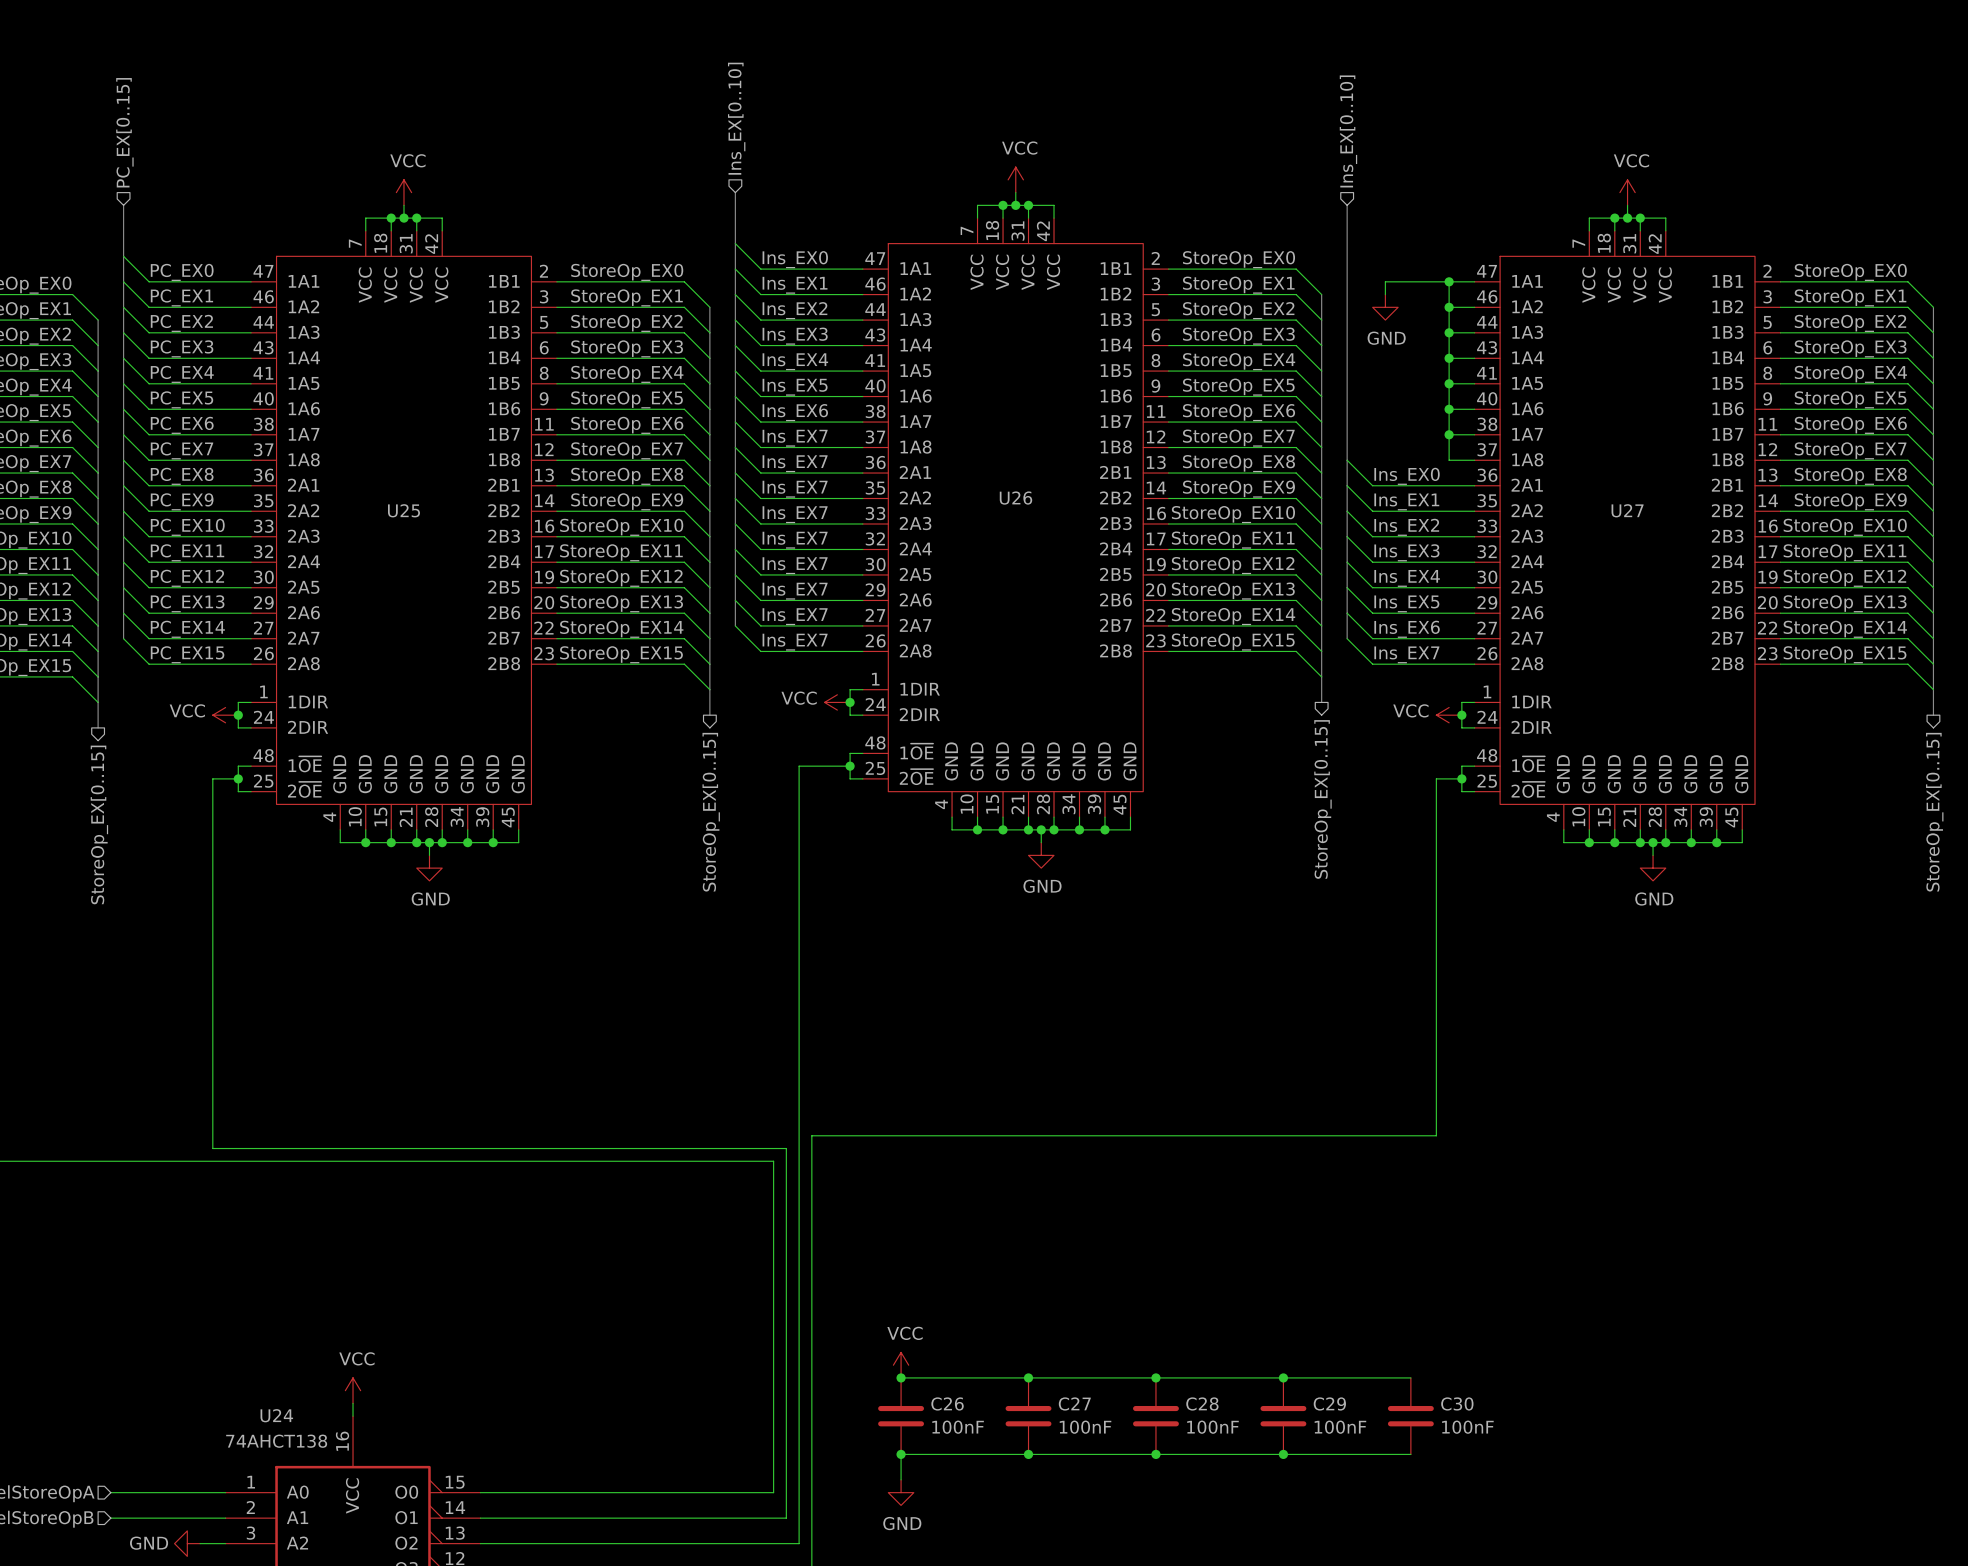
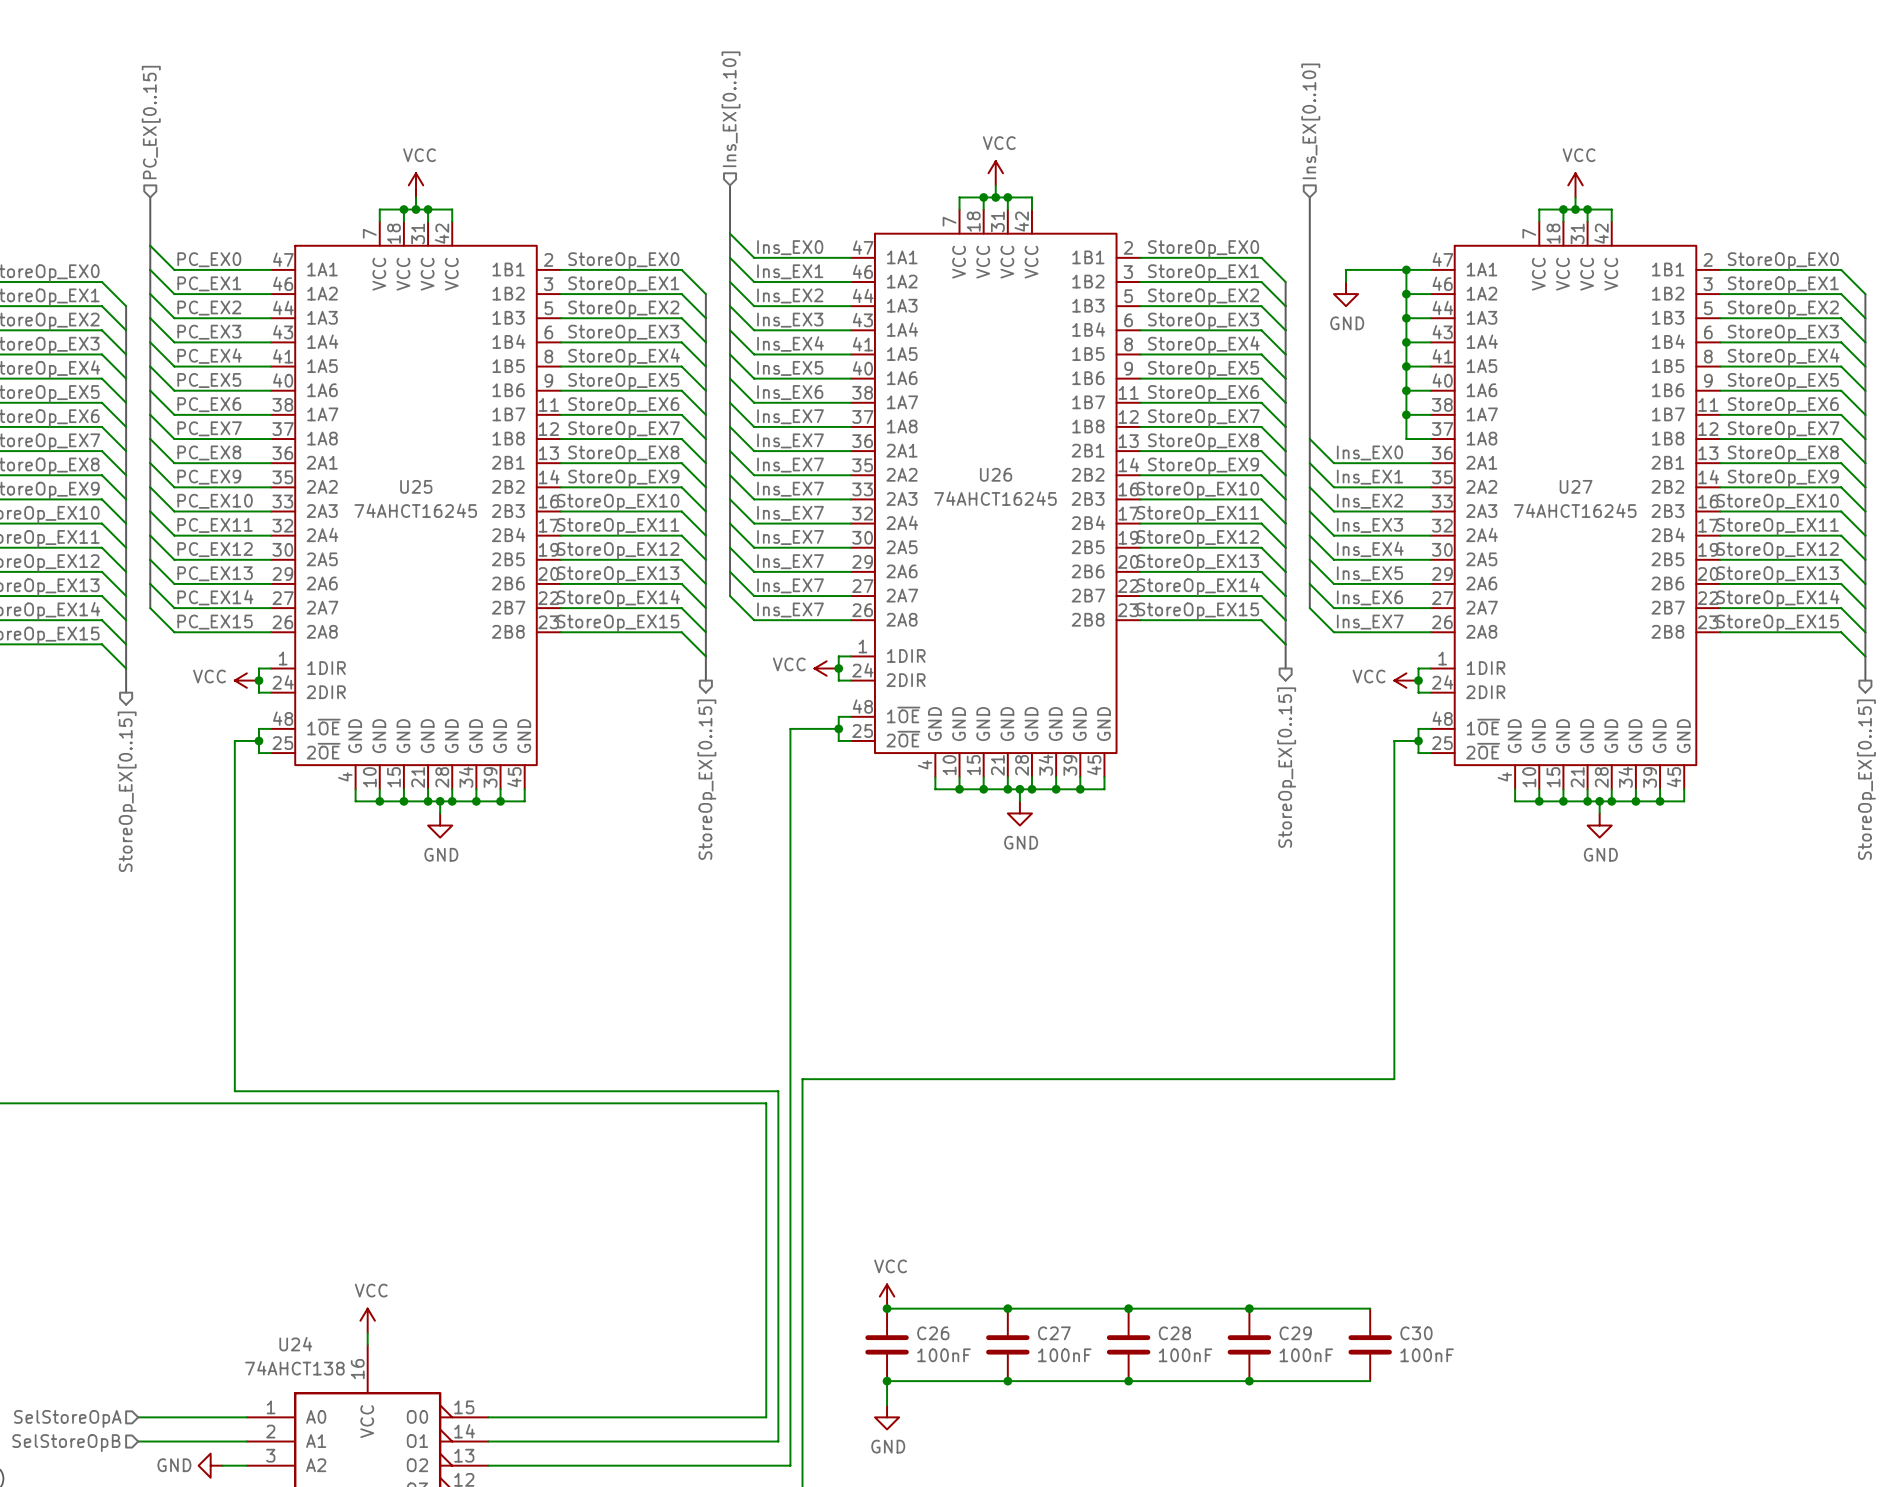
U26 value: none -> 74AHCT16245 (995, 498)
U25 value: none -> 74AHCT16245 (415, 510)
U27 value: none -> 74AHCT16245 (1575, 510)

